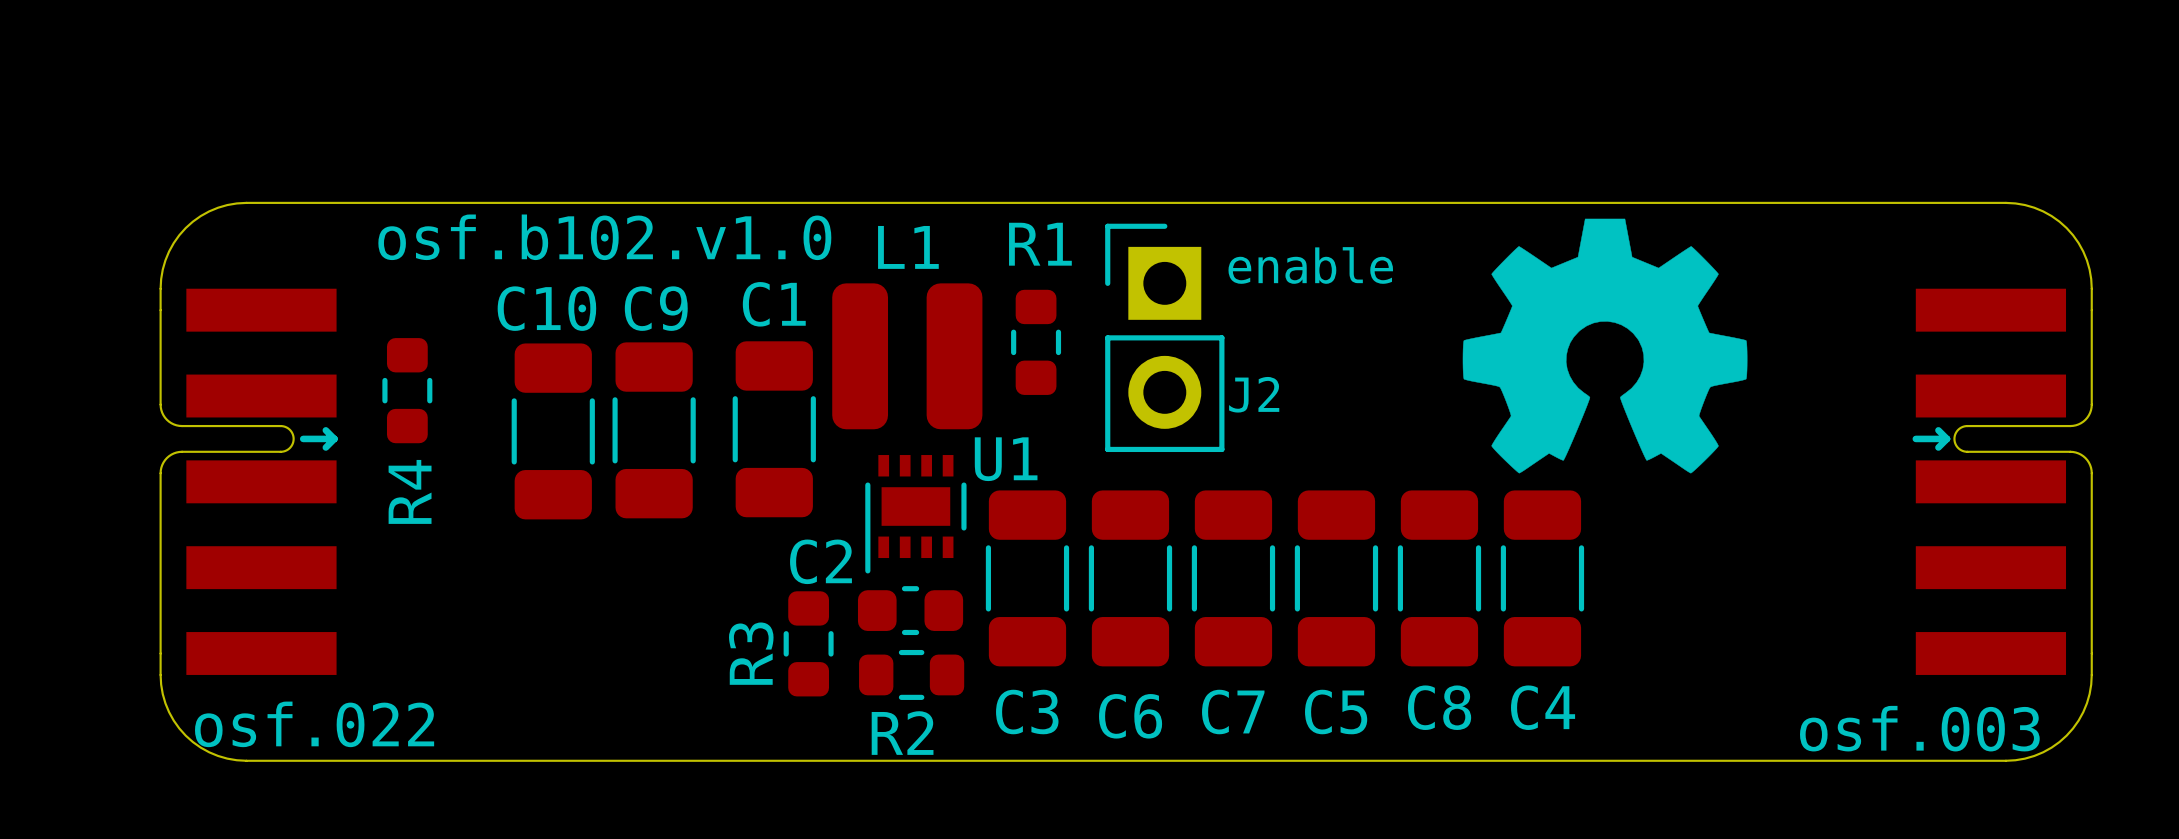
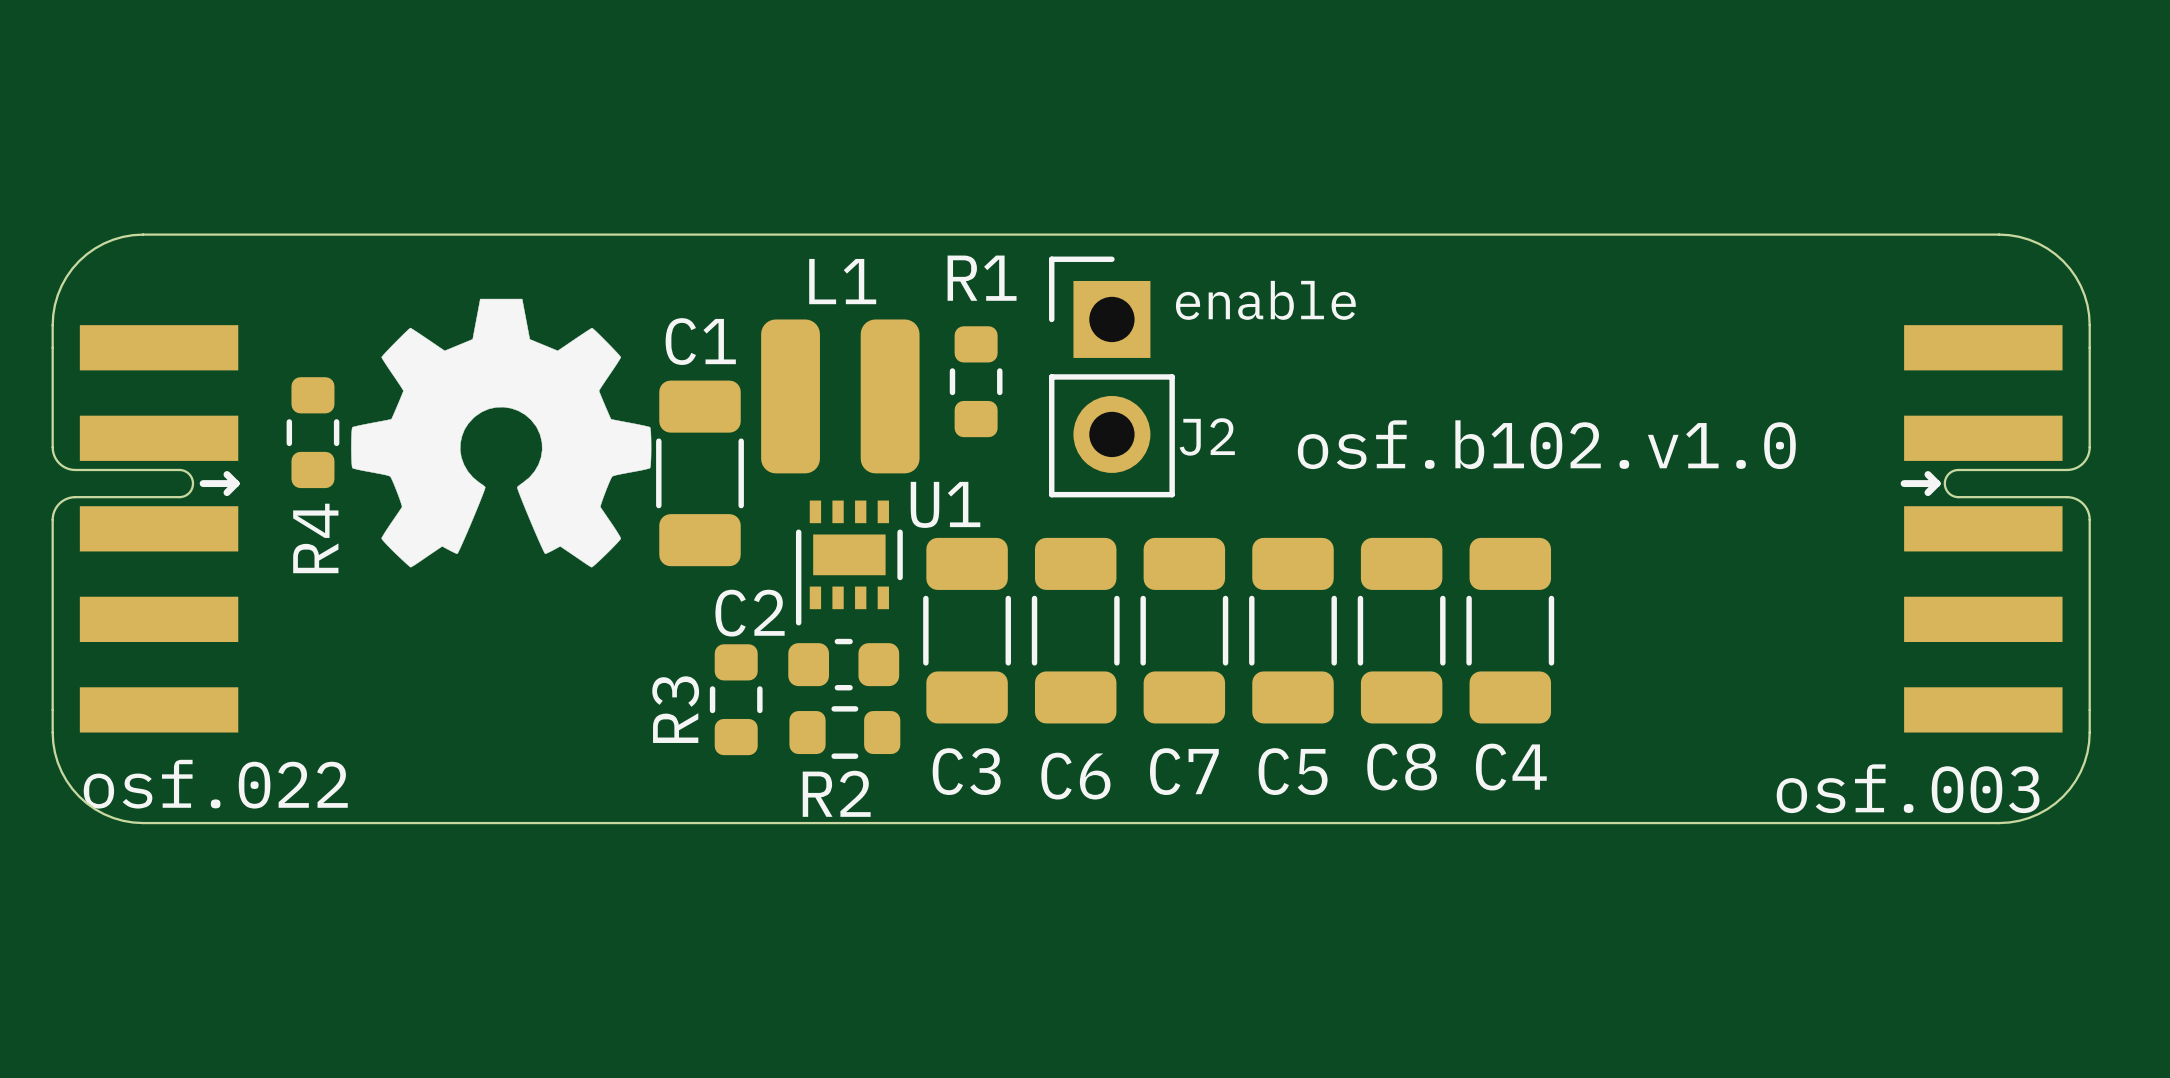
text position: osf.b102.v1.0 (604, 237) -> osf.b102.v1.0 (1546, 444)
drawing position: (1605, 346) -> (501, 433)
C9: (654, 430) -> none
C10: (553, 431) -> none

